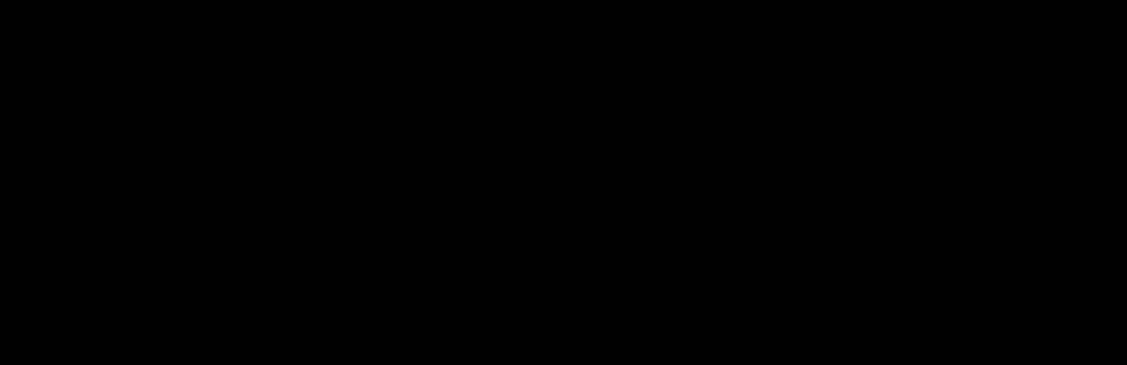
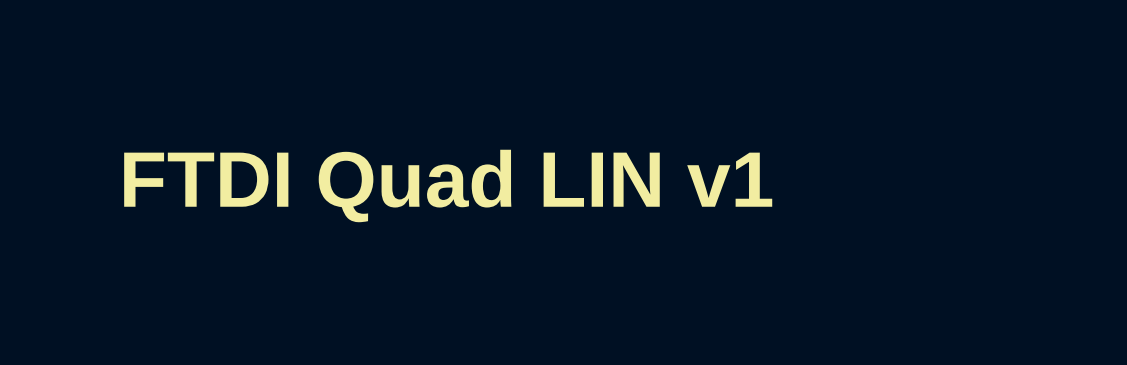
text: none -> FTDI Quad LIN v1 (448, 185)

